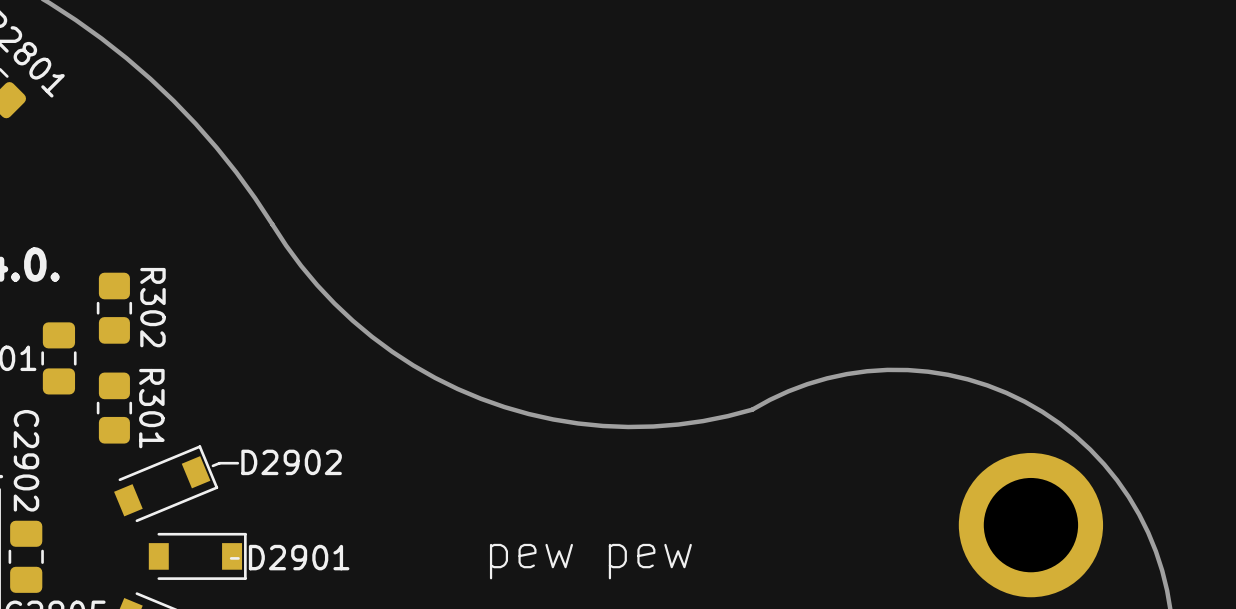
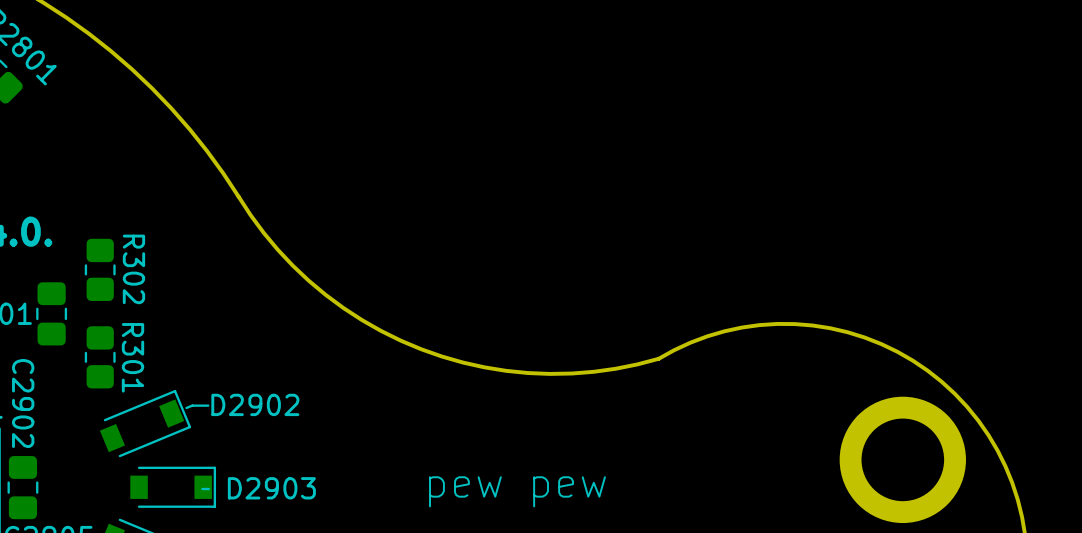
D2901 name: D2901 (299, 557) -> D2903 (271, 488)

